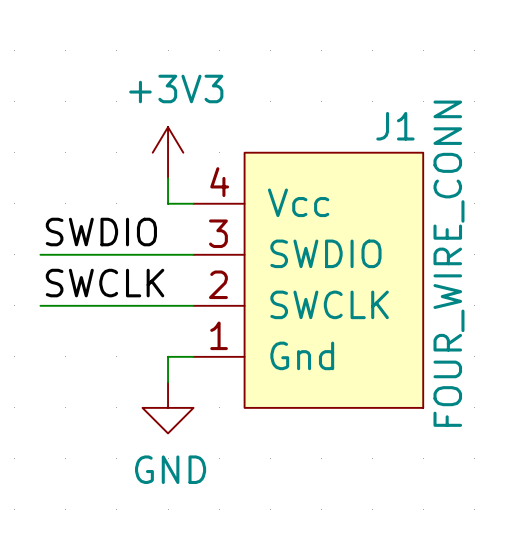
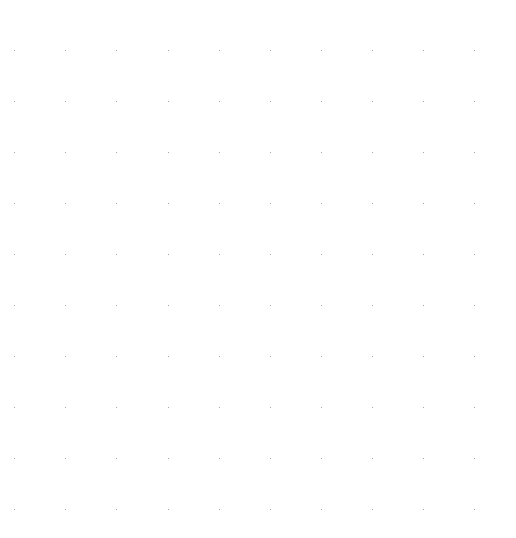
power symbol: +3V3 (168, 152) -> none
wire: (168, 178) (168, 203) (193, 203) -> none
label: SWDIO (101, 232) -> none
wire: (40, 254) (193, 254) -> none
J1: FOUR_WIRE_CONN (308, 280) -> none
label: SWCLK (105, 283) -> none
wire: (40, 305) (193, 305) -> none
wire: (193, 356) (168, 356) (168, 382) -> none
power symbol: GND (168, 407) -> none

